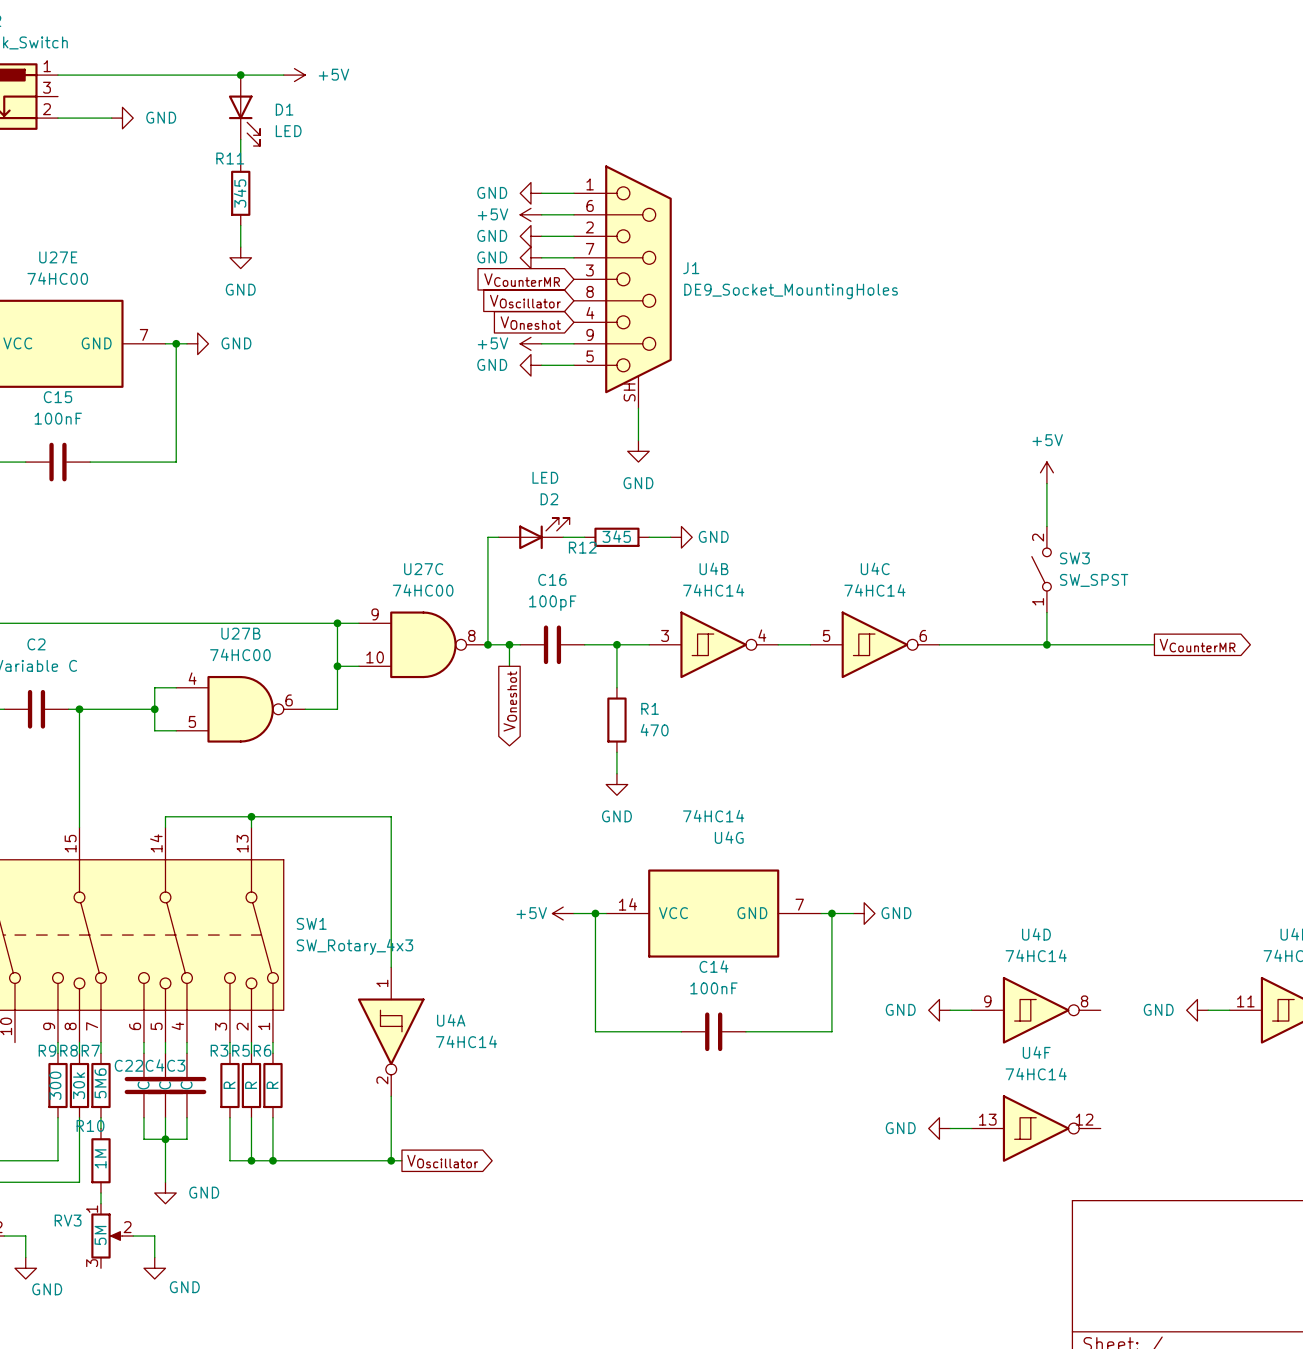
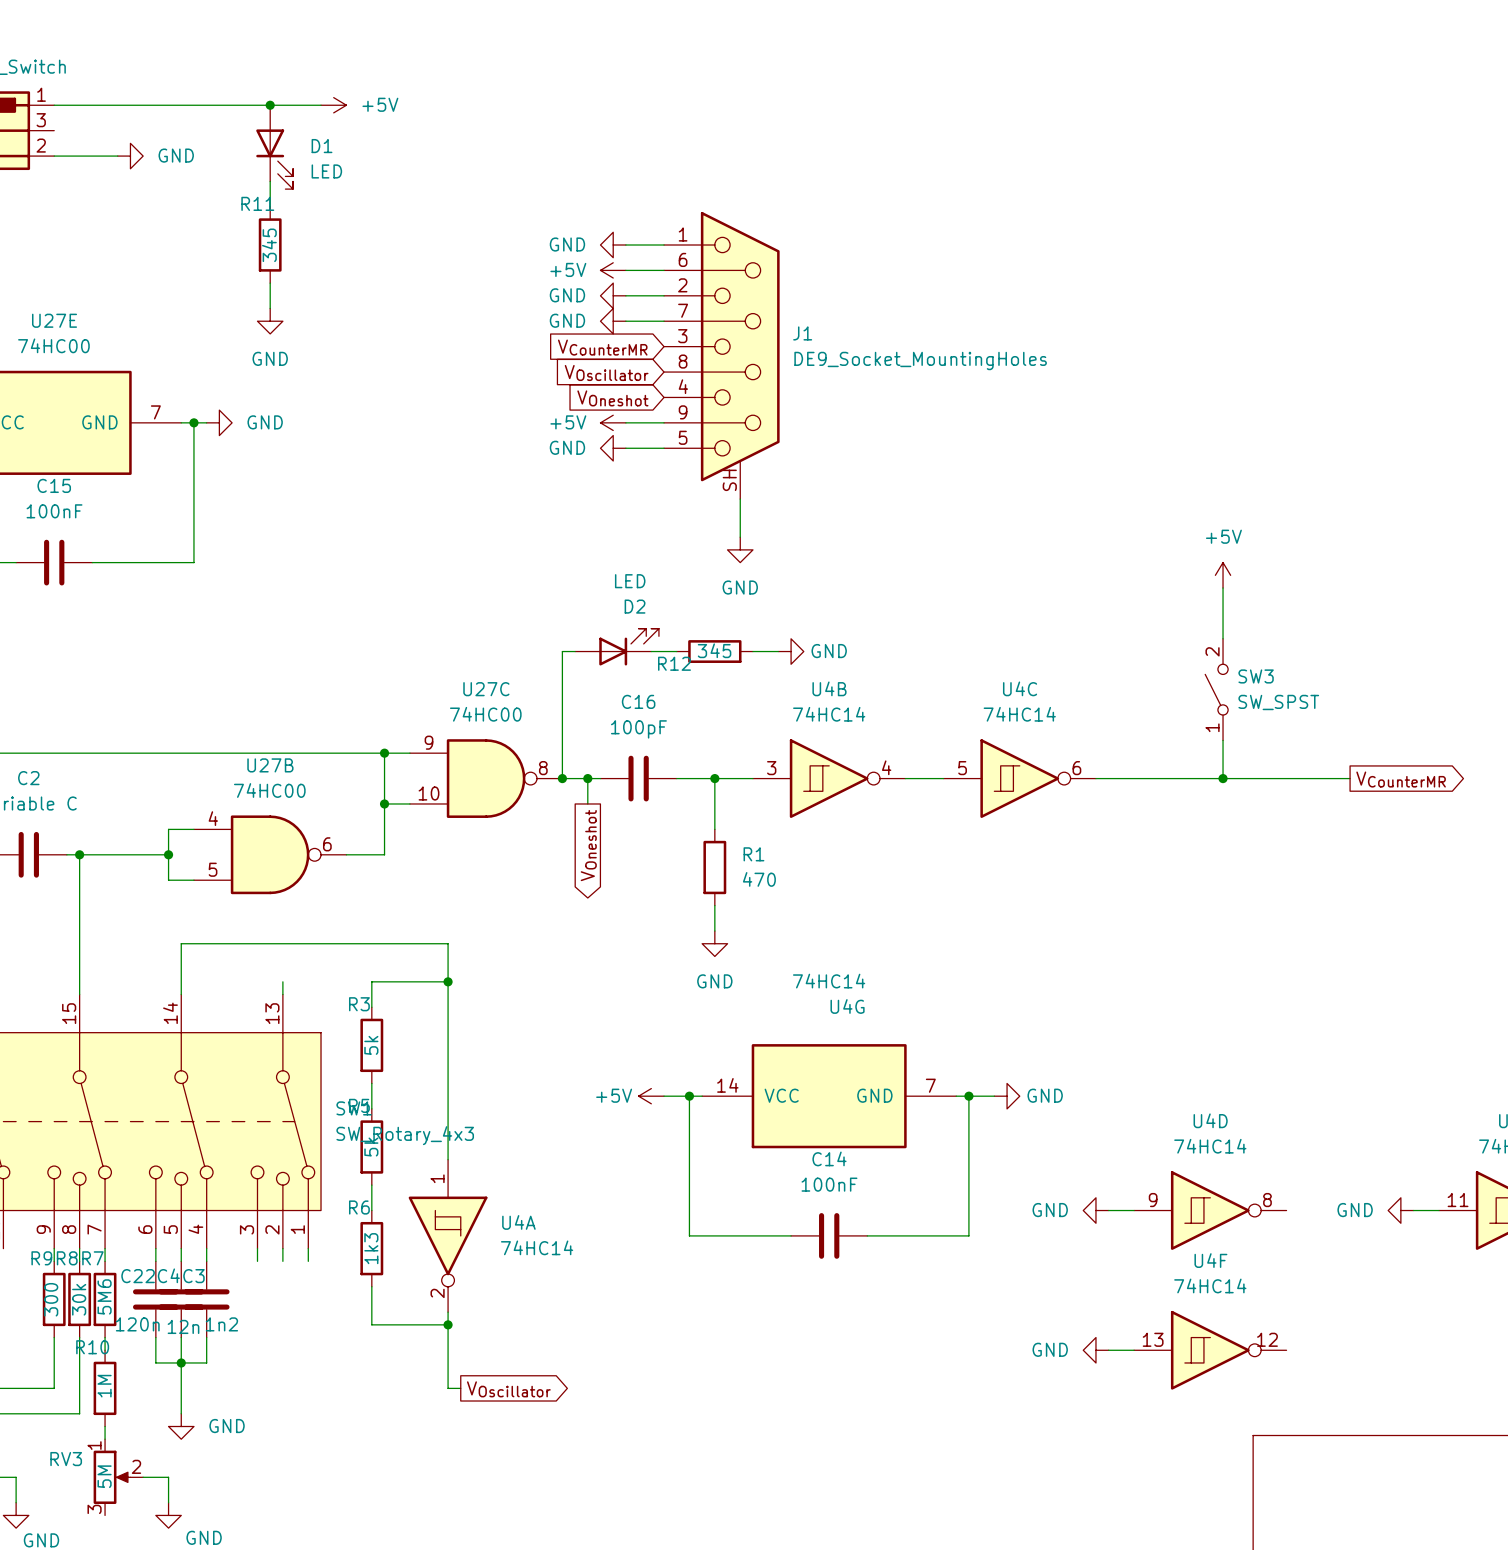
wire: (165, 816) (326, 816) -> (181, 981) (181, 943) (448, 943) (448, 981)
junction: (251, 816) -> none
wire: none -> (371, 981) (371, 1007)
junction: none -> (448, 981)
wire: none -> (371, 1083) (371, 1108)
wire: none -> (371, 1185) (371, 1210)
wire: none -> (371, 1286) (371, 1324) (448, 1324)
C22 value: C (143, 1085) -> 120n (137, 1324)
C4 value: C (165, 1085) -> 12n (183, 1326)
C3 value: C (186, 1085) -> 1n2 (221, 1324)
R3 position: (229, 1085) -> (371, 1045)
R3 value: R (229, 1085) -> 5k (371, 1045)
R5 position: (251, 1085) -> (371, 1147)
R5 value: R (251, 1085) -> 5k (371, 1147)
R6 position: (272, 1085) -> (371, 1248)
R6 value: R (272, 1085) -> 1k3 (371, 1248)
junction: none -> (448, 1324)
wire: (229, 1117) (229, 1160) (391, 1160) -> none
wire: (251, 1117) (251, 1160) -> none
wire: (272, 1117) (272, 1160) -> none
junction: (251, 1160) -> none
junction: (272, 1160) -> none
junction: (391, 1160) -> none

